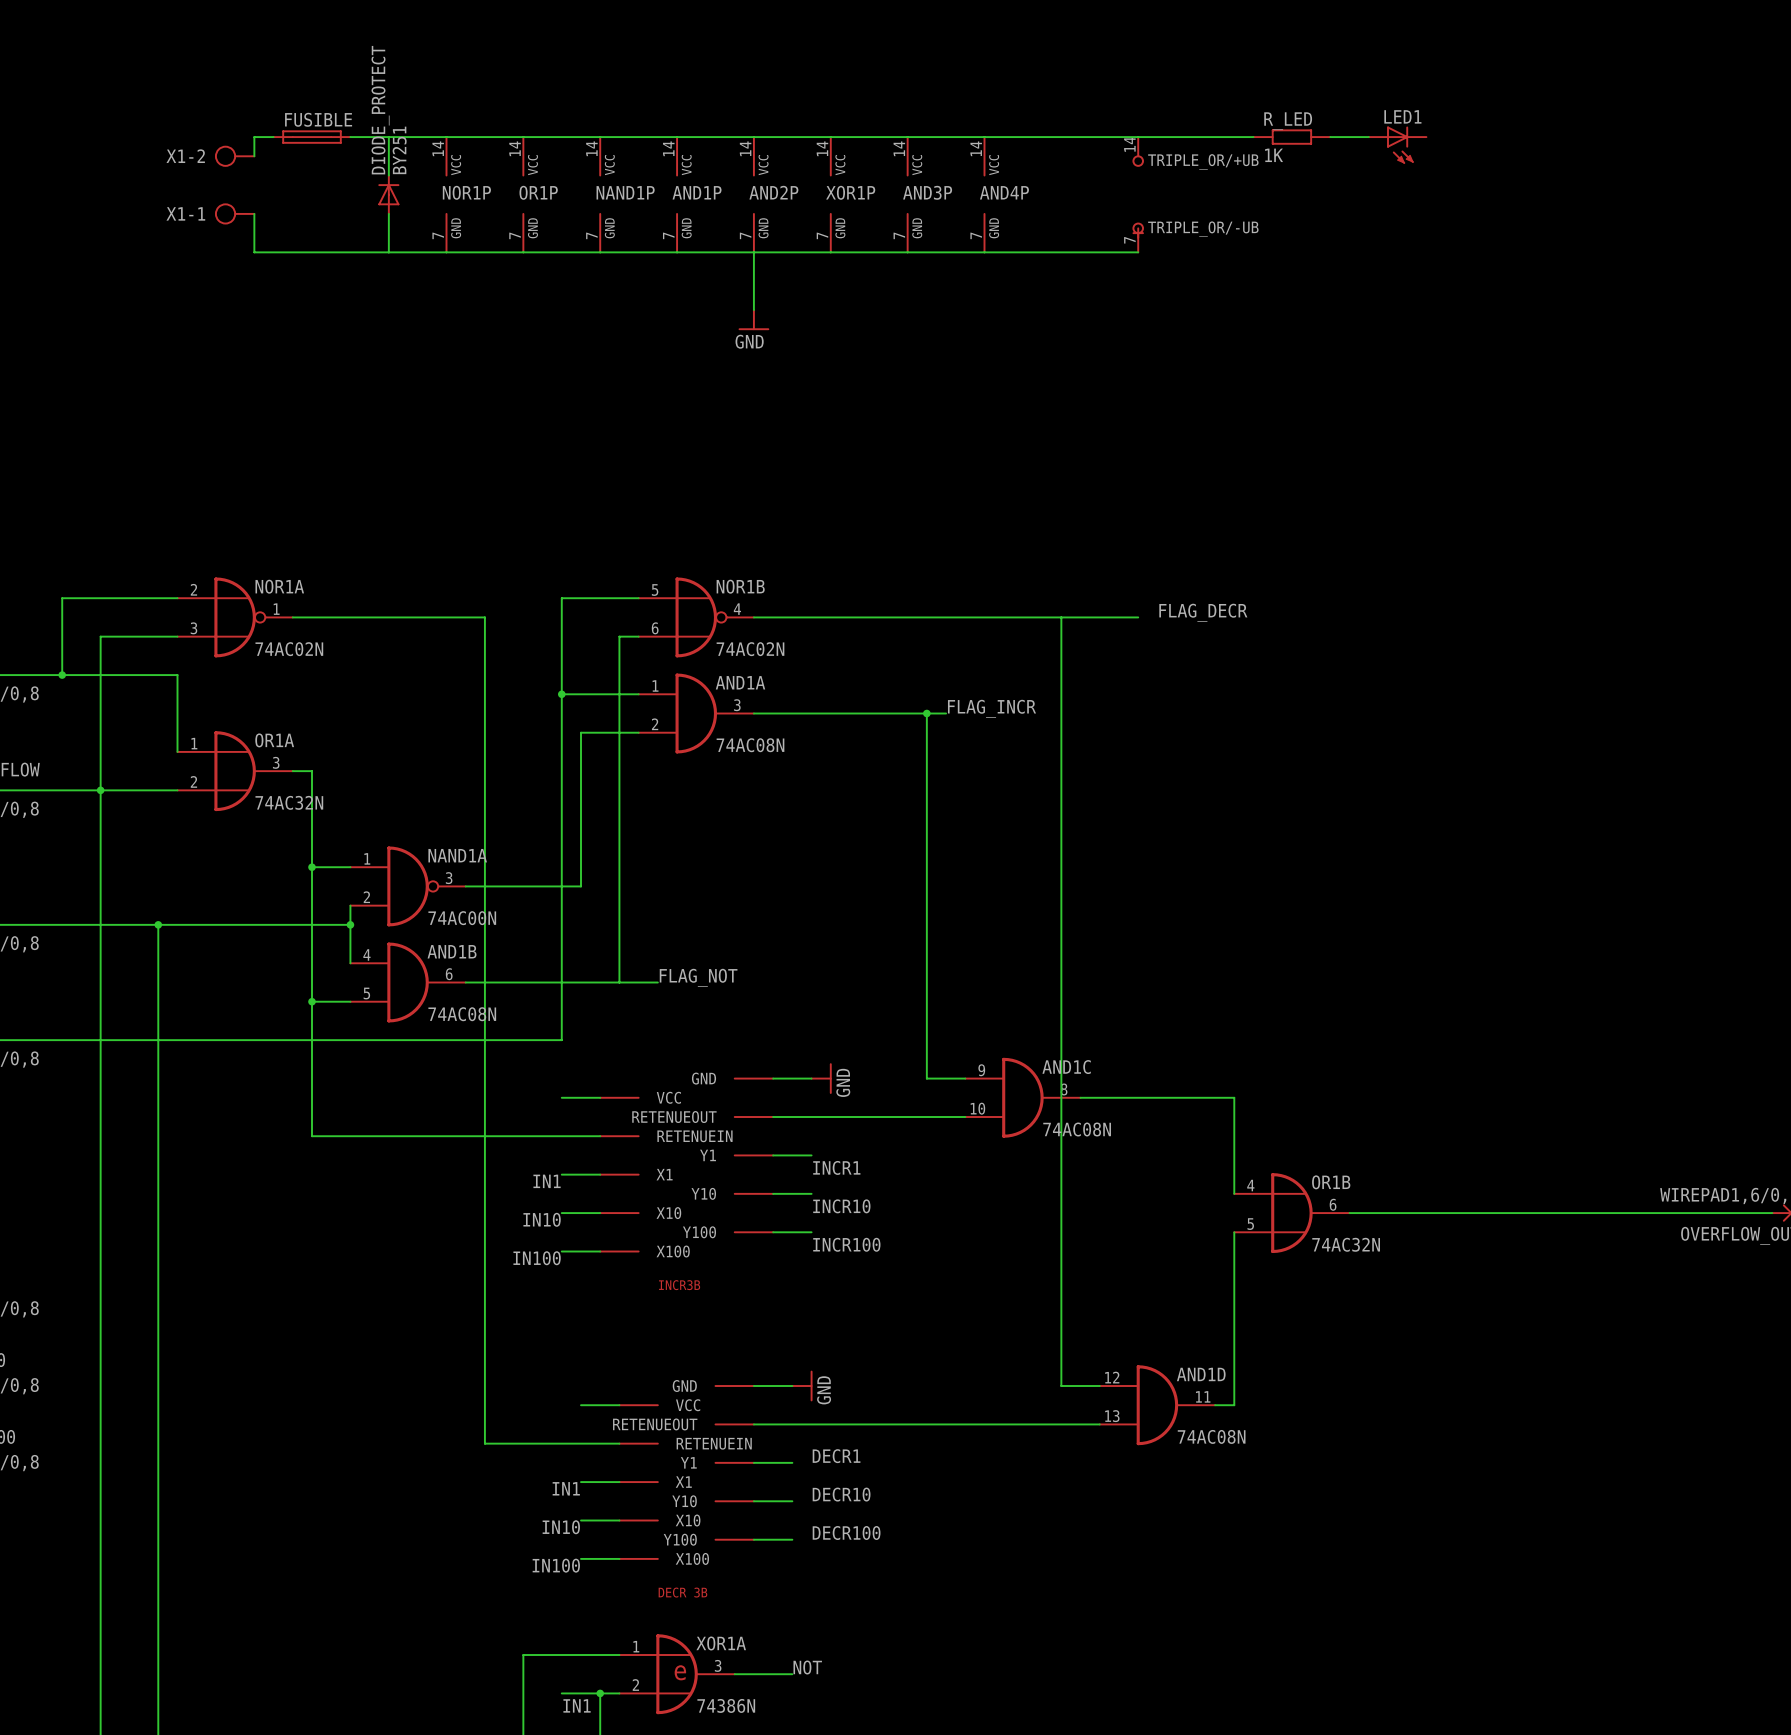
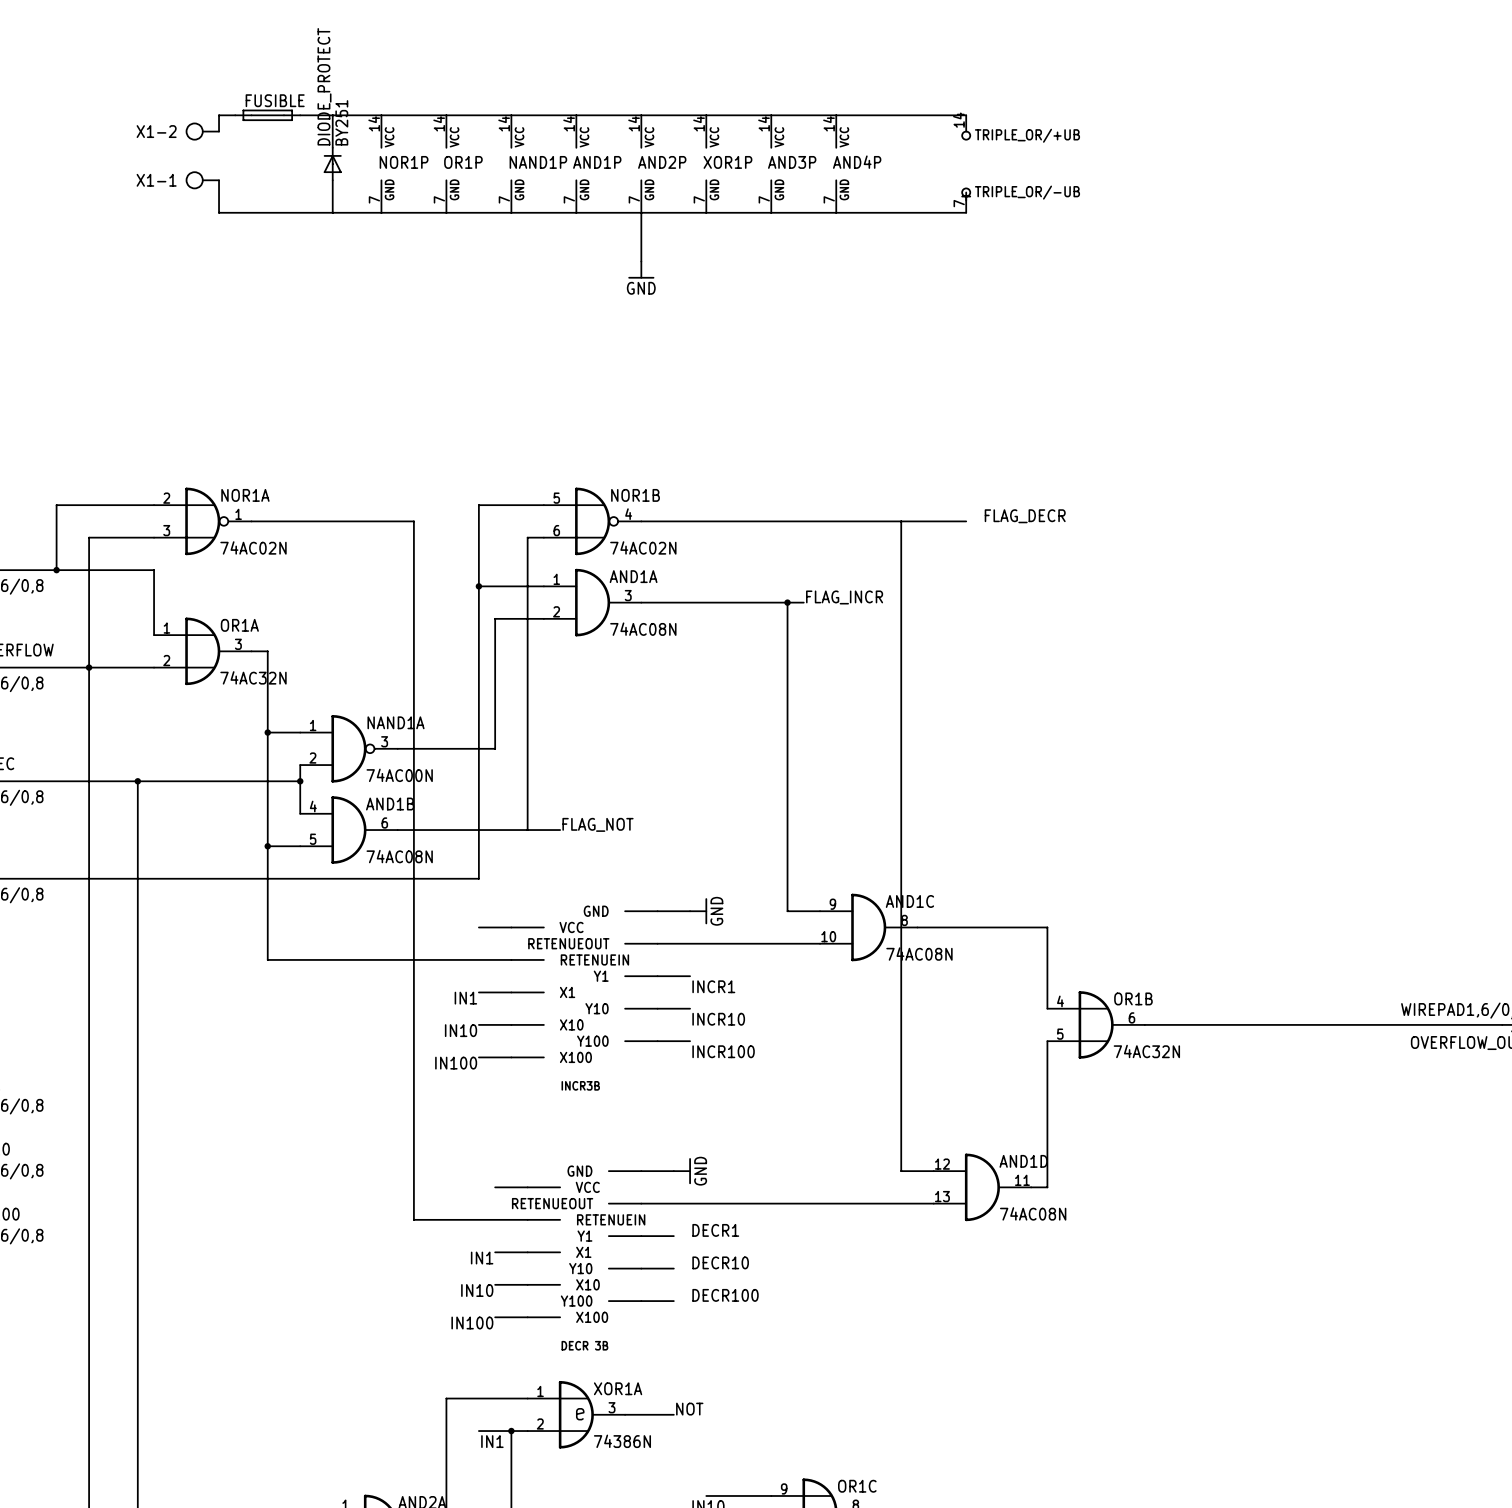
wire: (1138, 137) (1253, 137) -> none
R_LED: 1K (1291, 137) -> none
wire: (1330, 137) (1368, 137) -> none
LED1: (1397, 145) -> none

